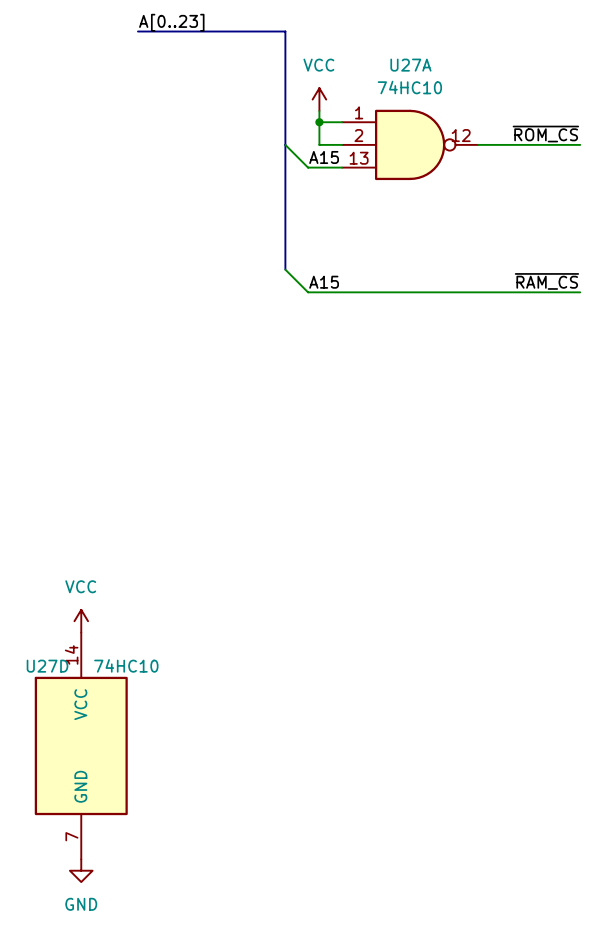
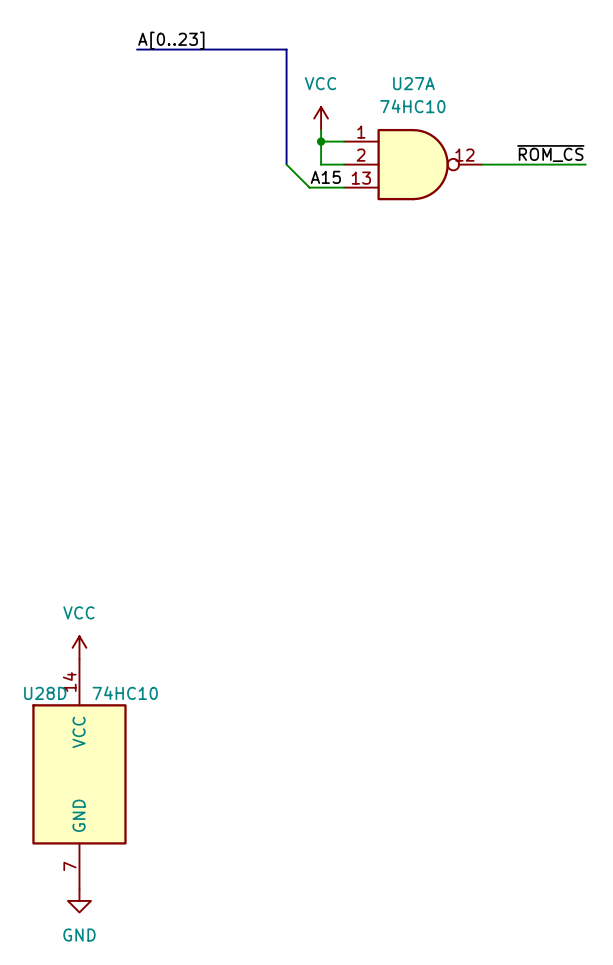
bus: (285, 144) (285, 269) -> none
wire: (285, 269) (308, 292) (580, 292) -> none
label: ~{RAM_CS} (546, 281) -> none
label: A15 (324, 282) -> none
U27D name: U27D (47, 666) -> U28D (45, 693)

